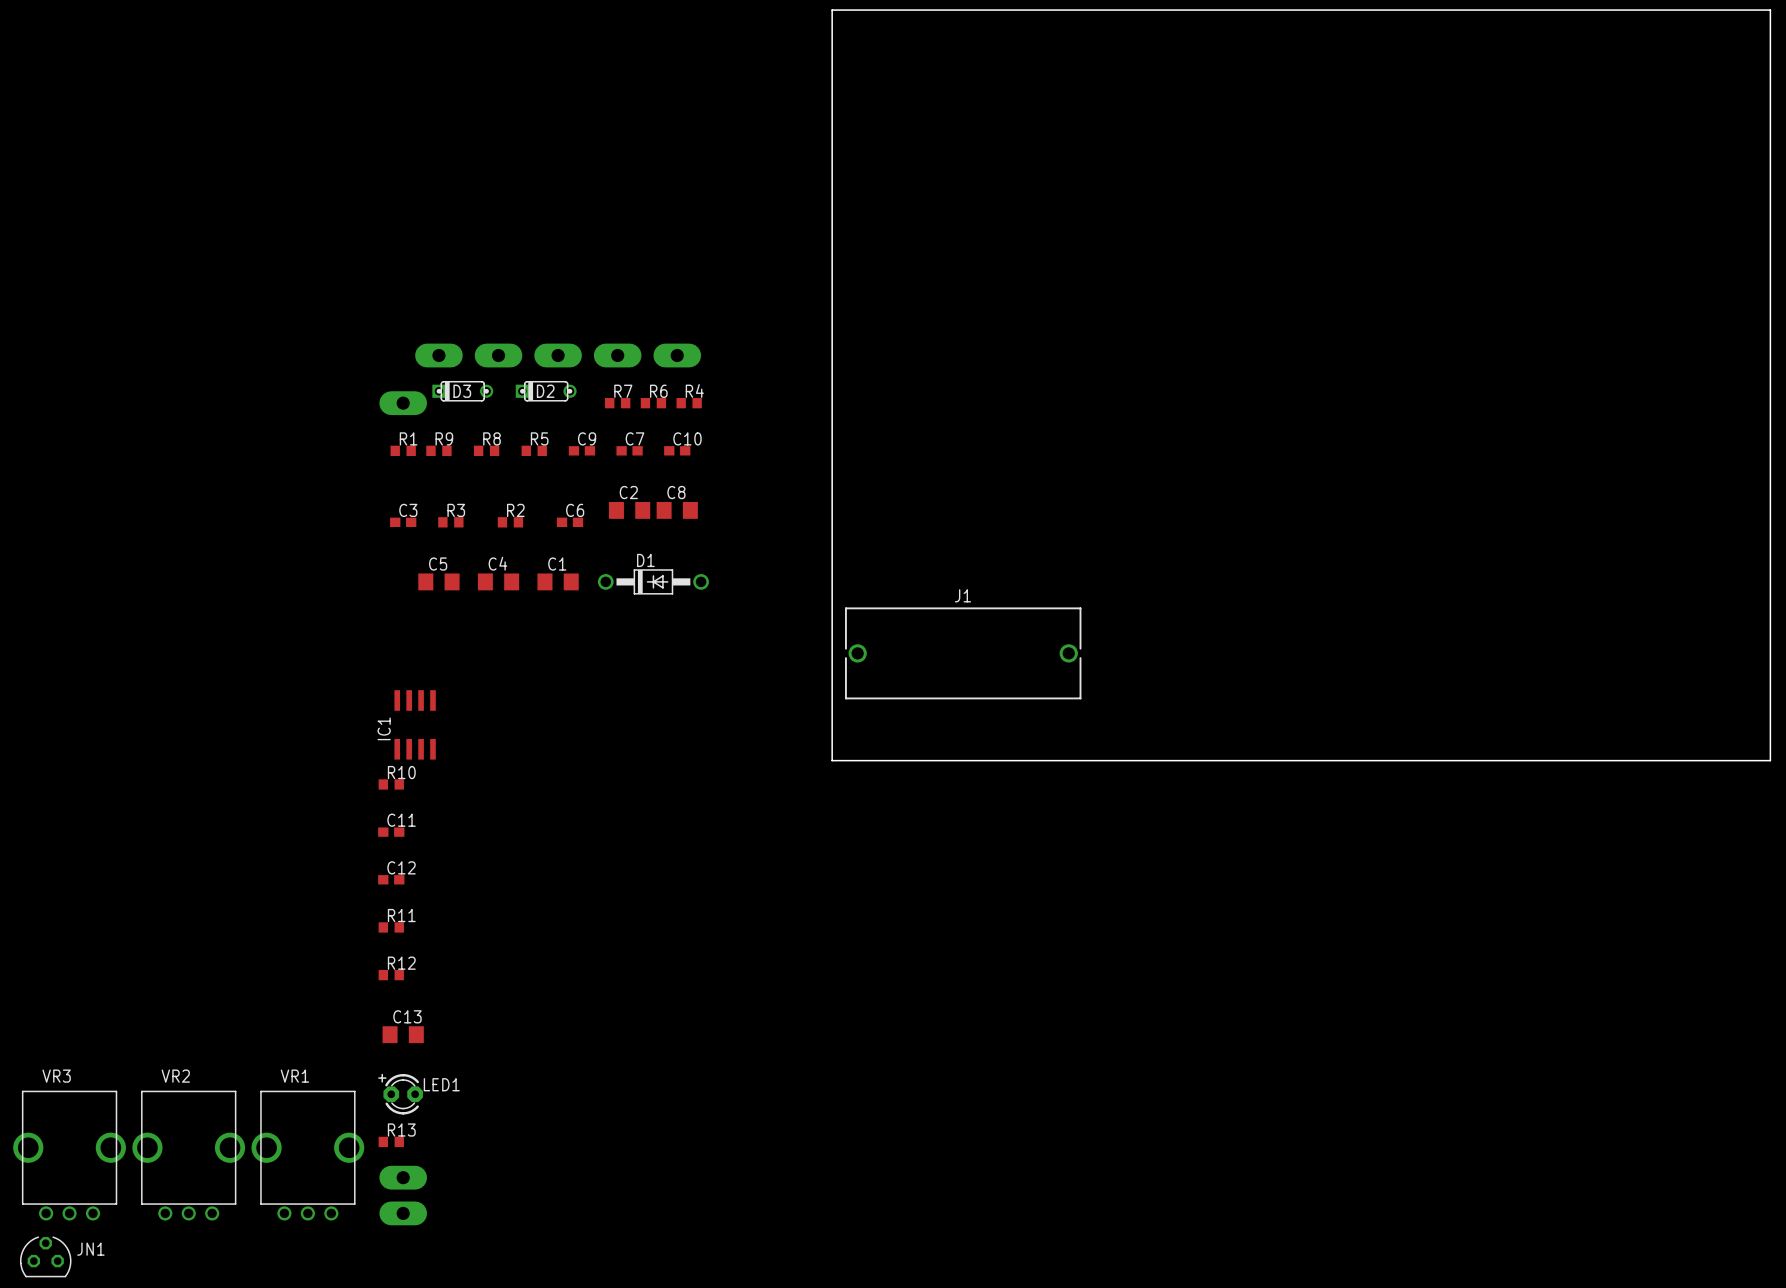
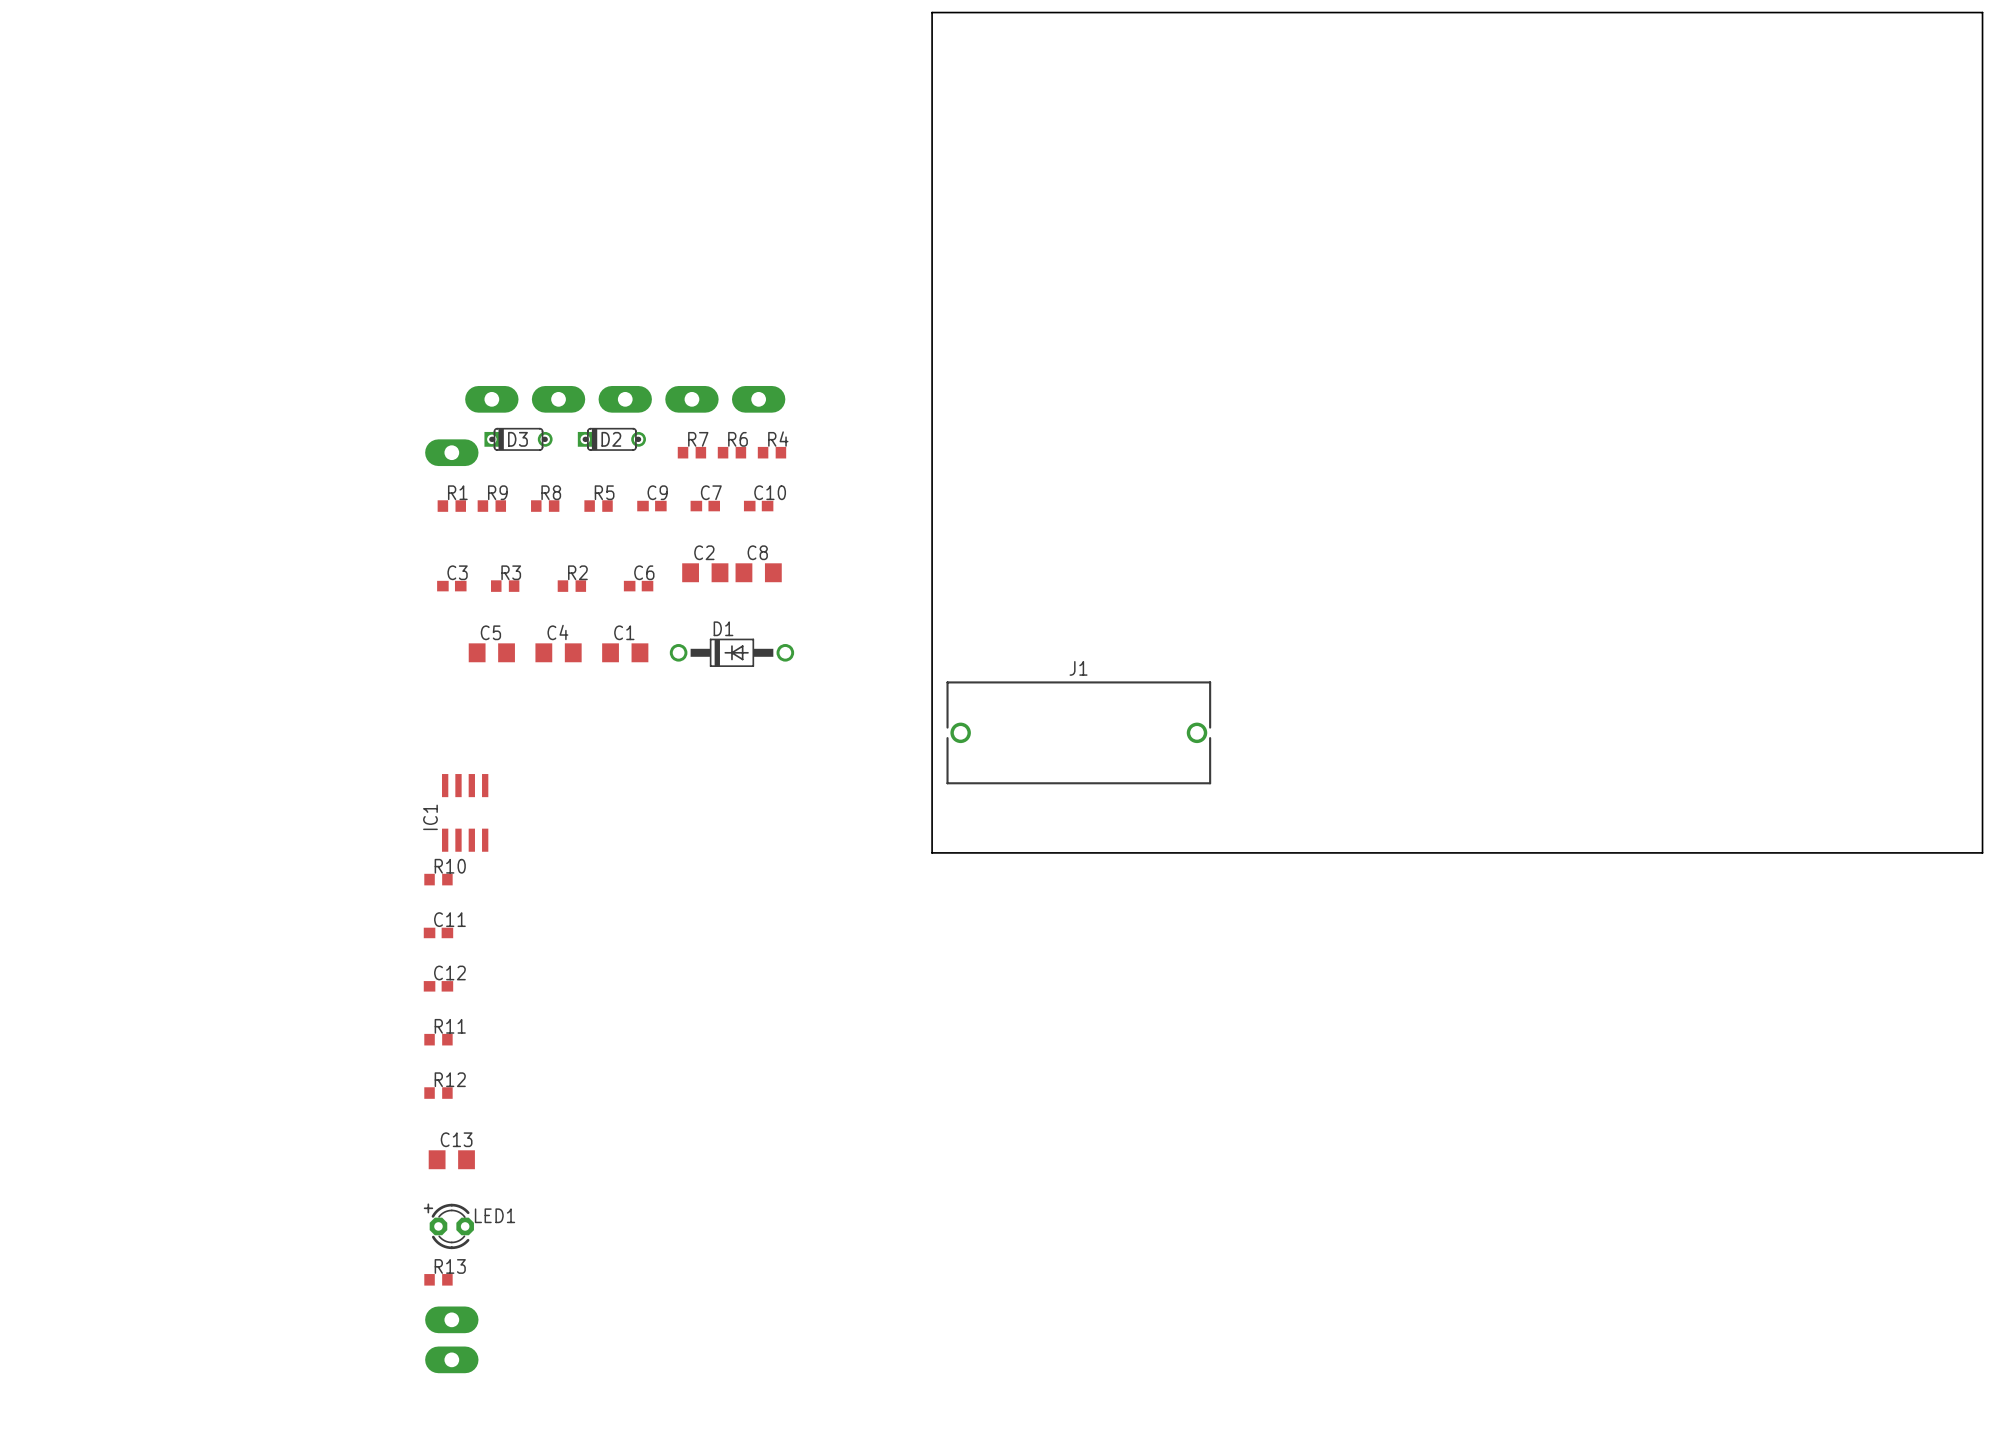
VR3: (69, 1155) -> none
VR2: (188, 1155) -> none
VR1: (307, 1155) -> none
JN1: (45, 1256) -> none

